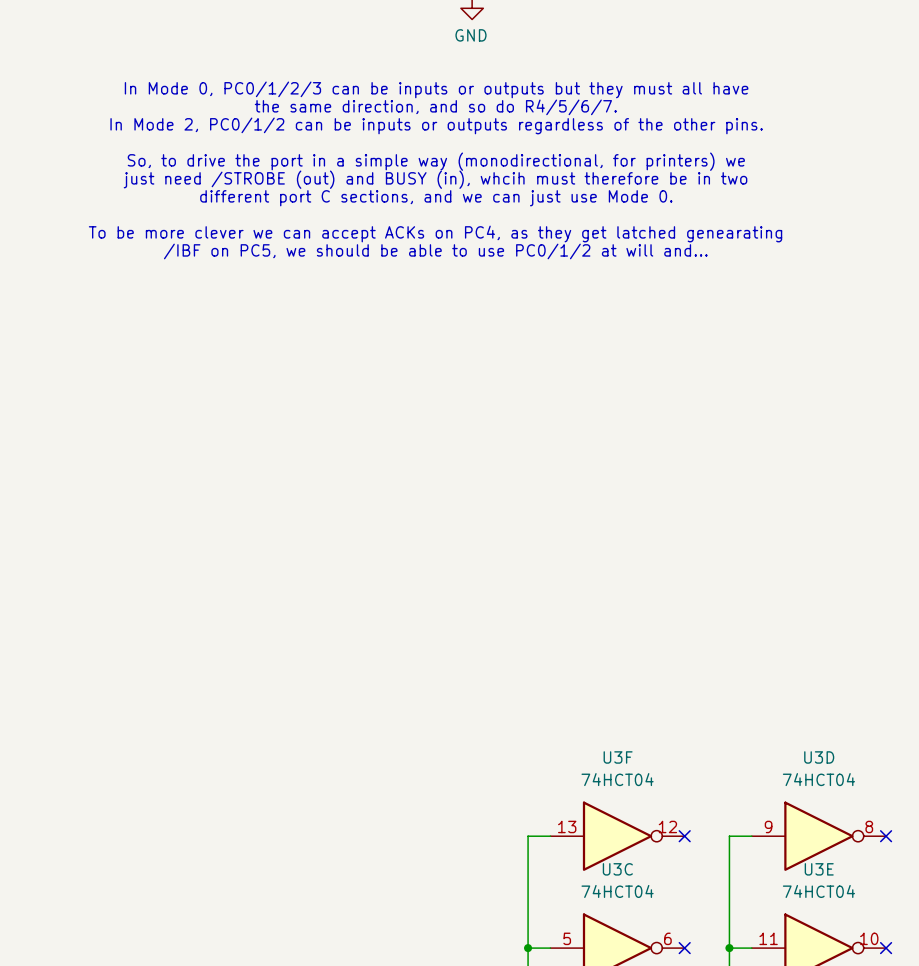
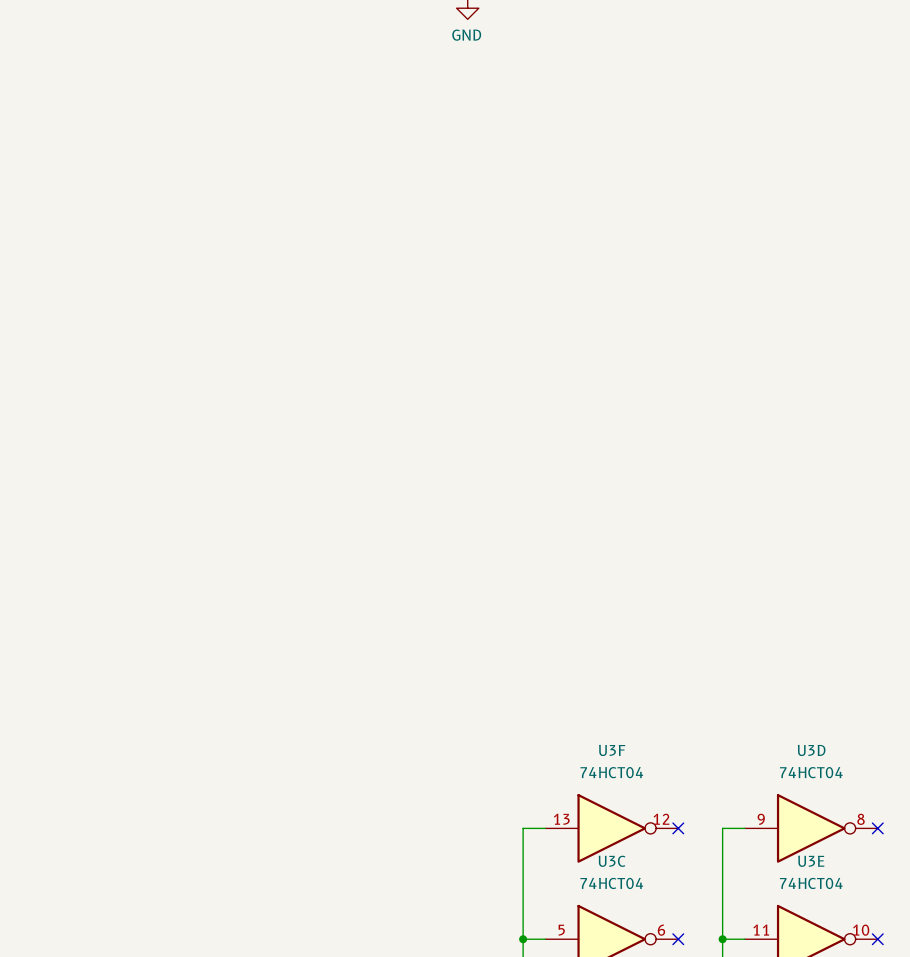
text: In Mode 0, PC0/1/2/3 can be inputs or outputs but they must all have (436, 89) -> none
text: the same direction, and so do R4/5/6/7. (435, 107) -> none
text: In Mode 2, PC0/1/2 can be inputs or outputs regardless of the other pins. (436, 125) -> none
text: So, to drive the port in a simple way (monodirectional, for printers) we (436, 161) -> none
text: just need /STROBE (out) and BUSY (in), whcih must therefore be in two (435, 179) -> none
text: different port C sections, and we can just use Mode 0. (436, 198) -> none
text: To be more clever we can accept ACKs on PC4, as they get latched genearating (435, 234) -> none
text: /IBF on PC5, we should be able to use PC0/1/2 at will and... (435, 251) -> none

